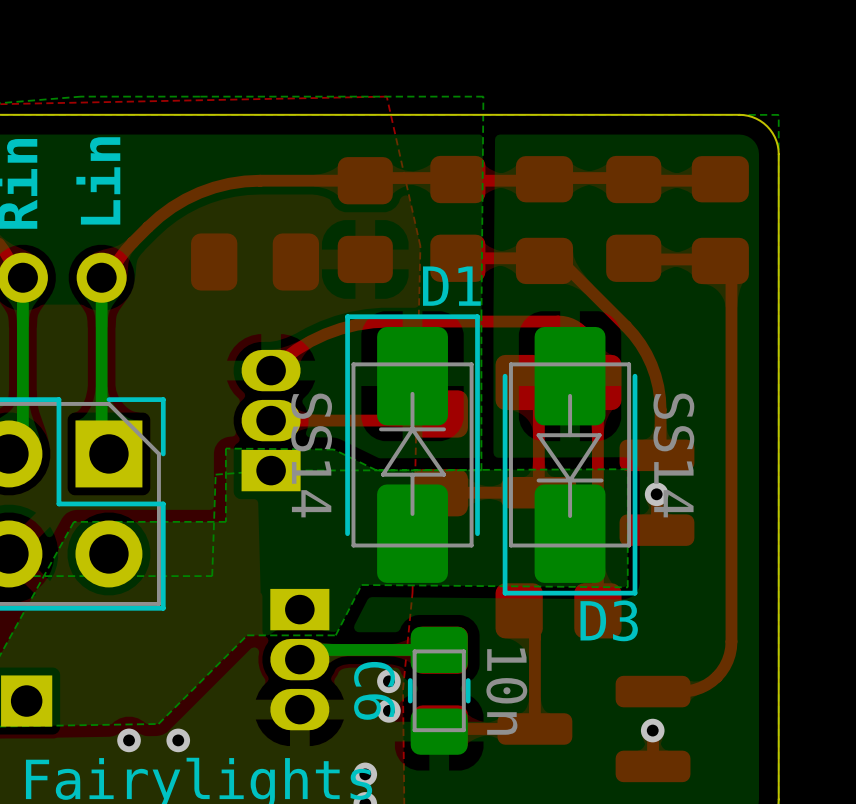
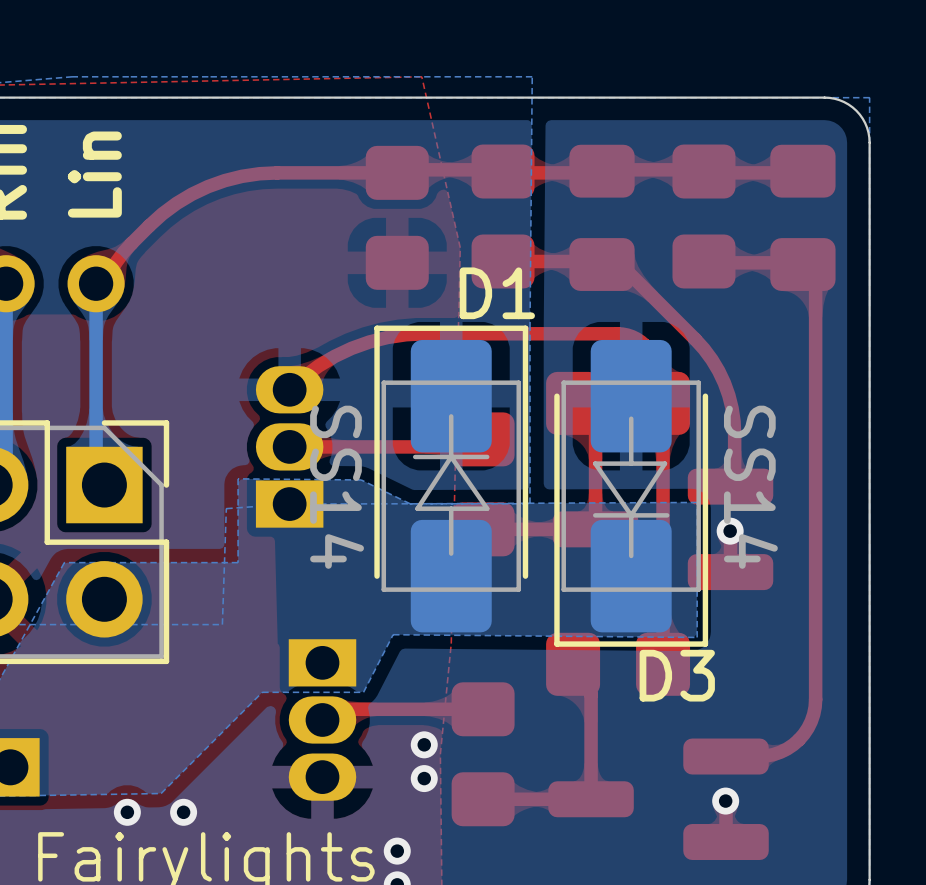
part: (255, 261) -> none
bottom track: (439, 649) (309, 649) (299, 659) -> none
C6: 10n (439, 690) -> none

